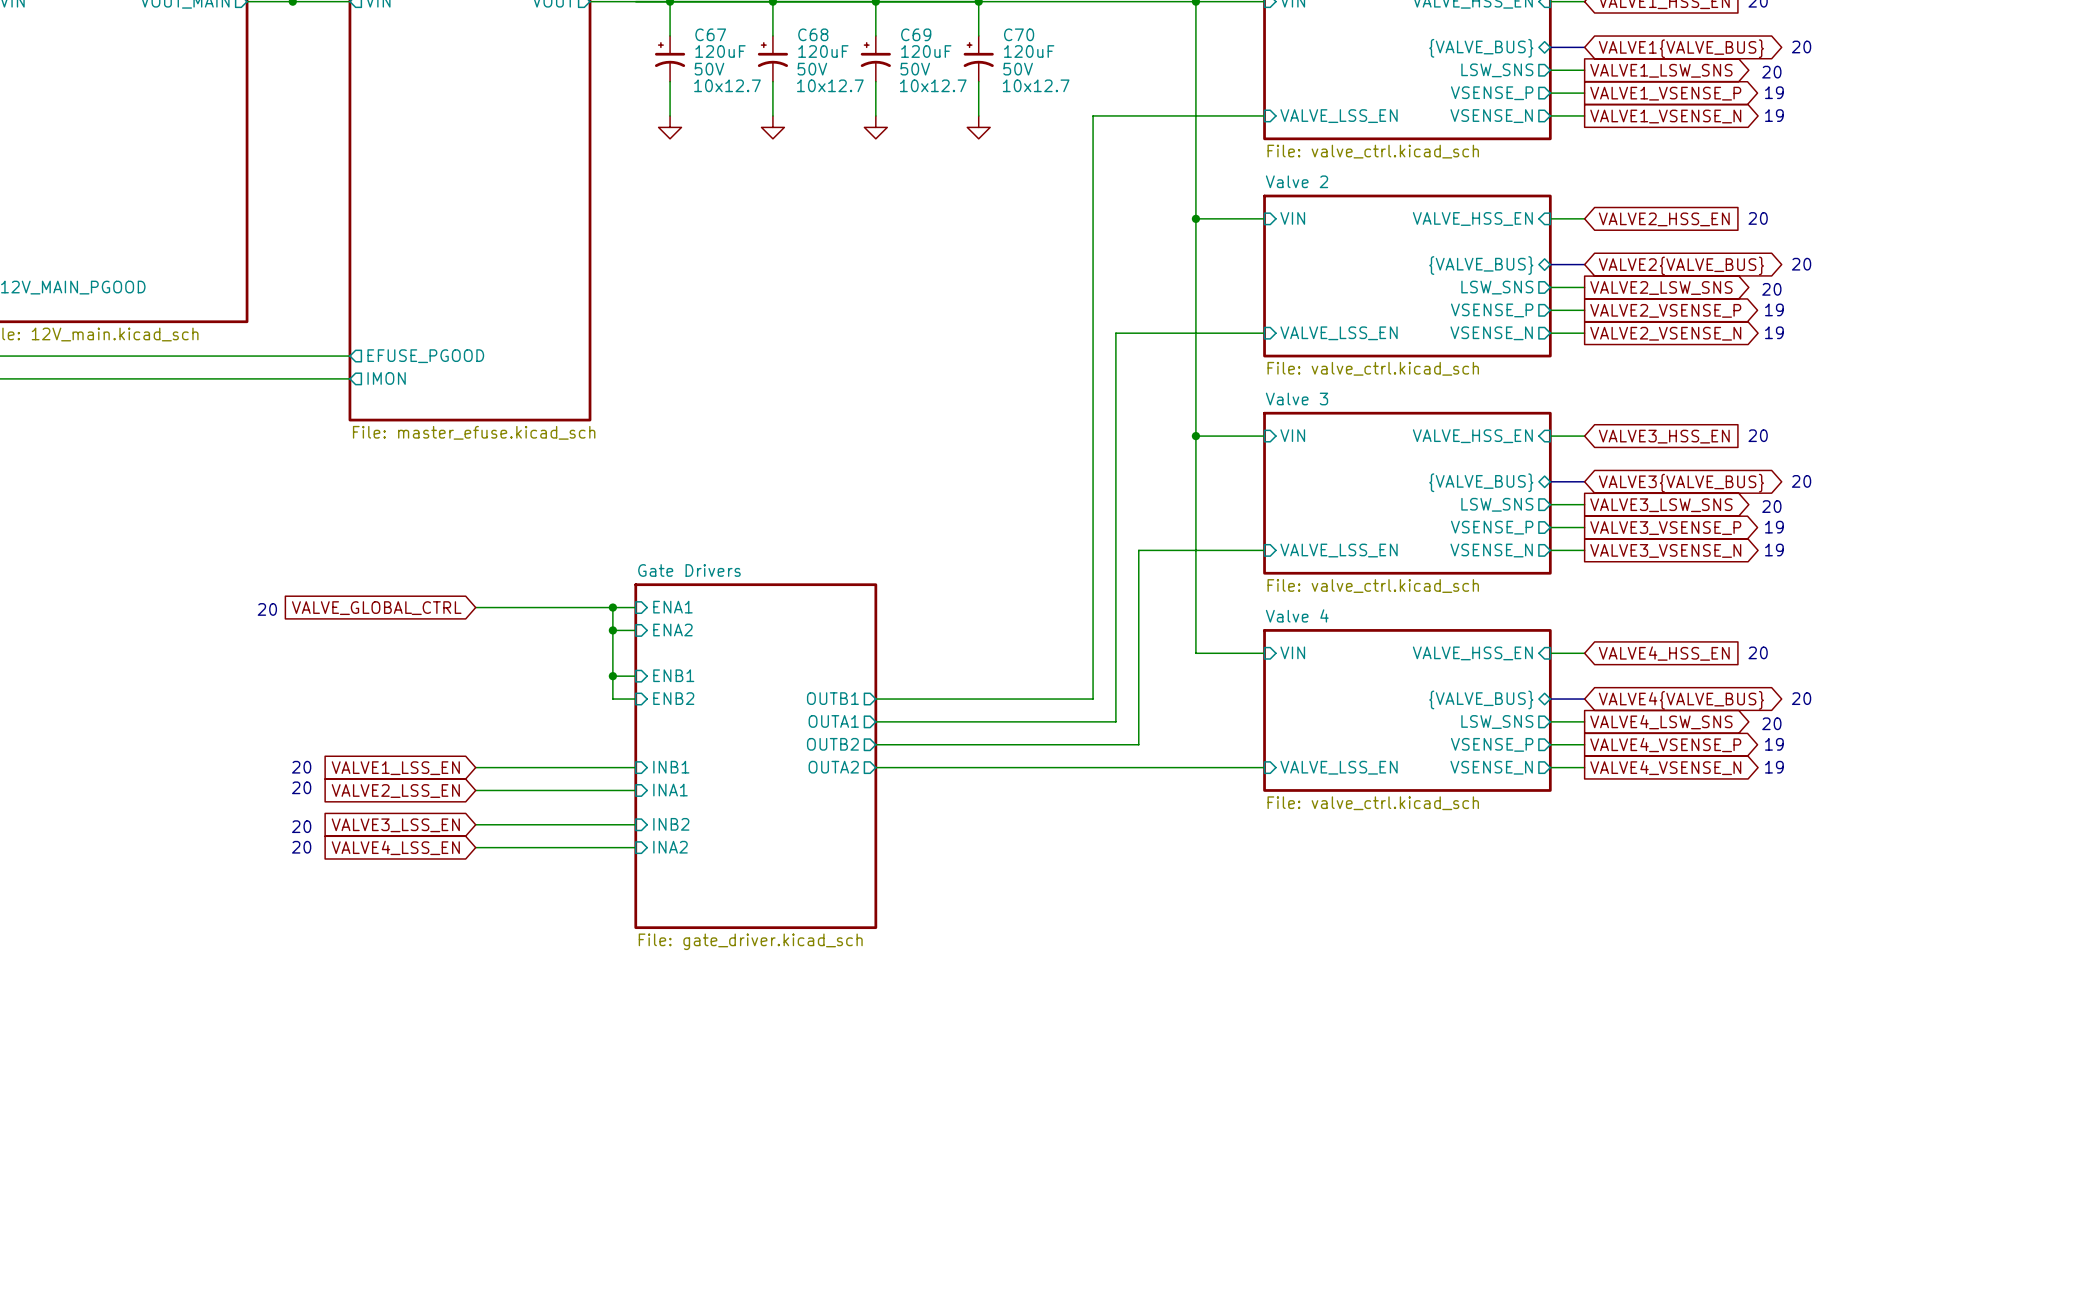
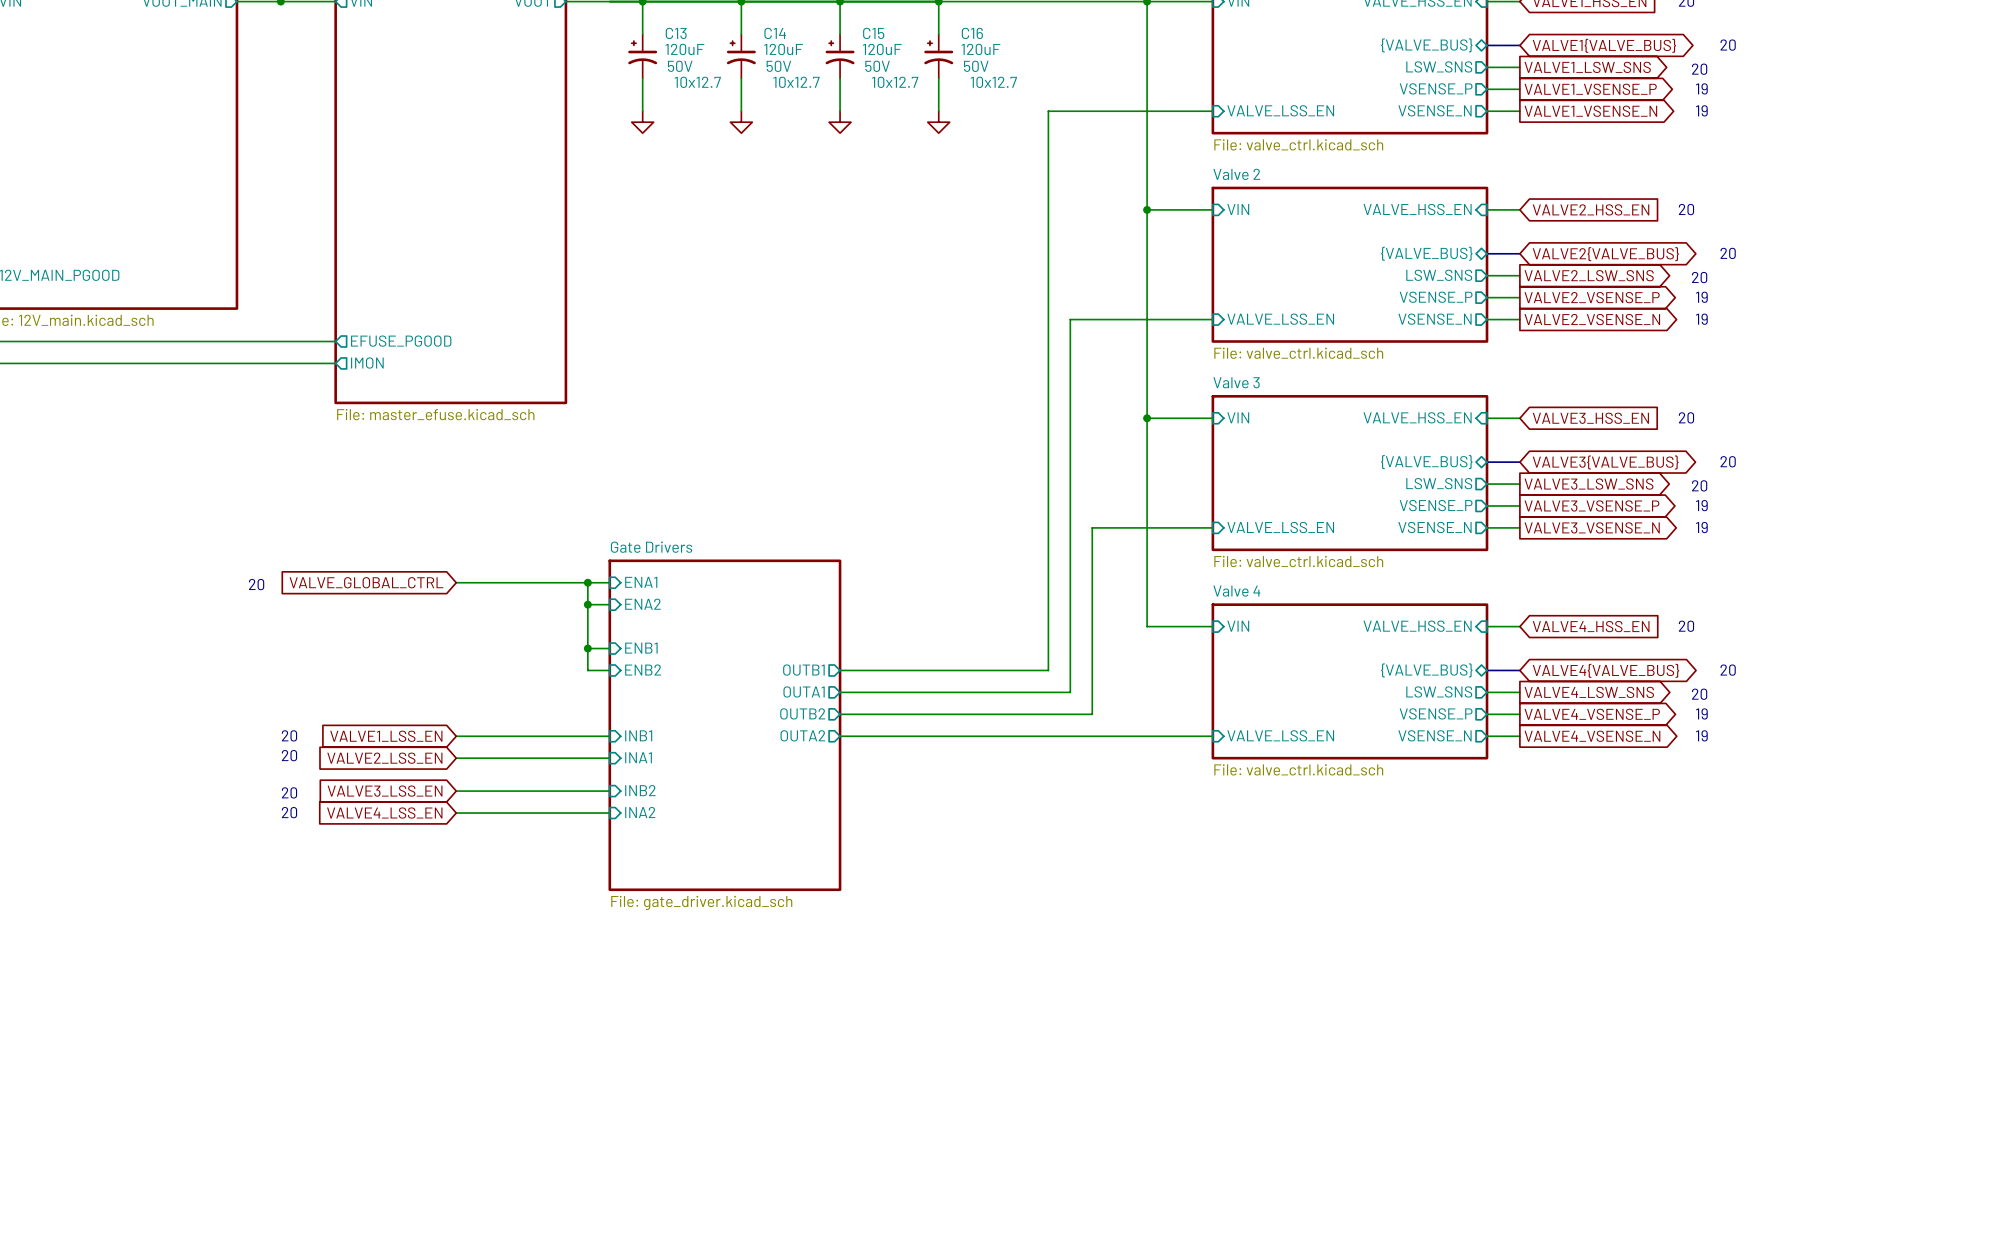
C67 name: C67 (710, 34) -> C13 (676, 33)
C68 name: C68 (813, 34) -> C14 (775, 33)
C69 name: C69 (916, 34) -> C15 (873, 33)
C70 name: C70 (1019, 34) -> C16 (972, 33)

